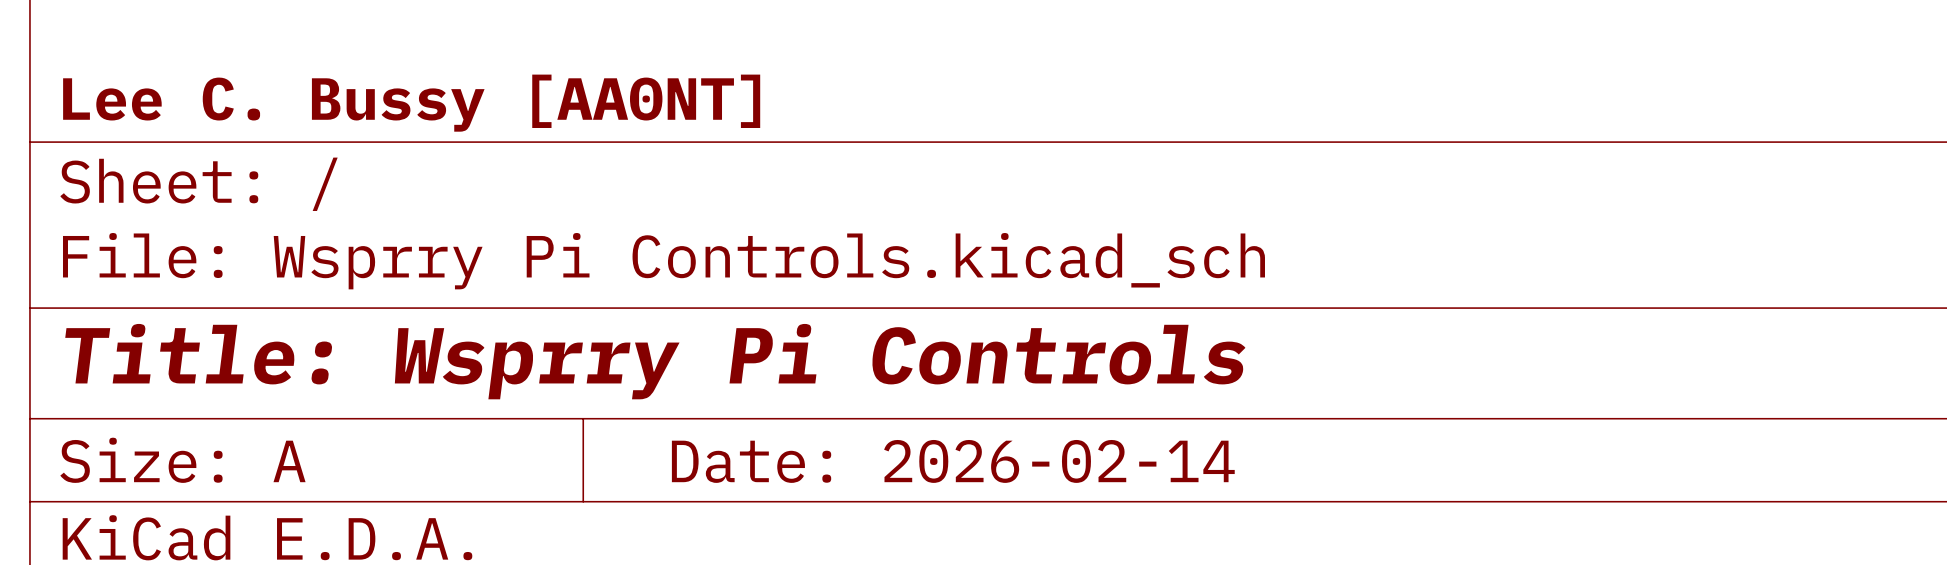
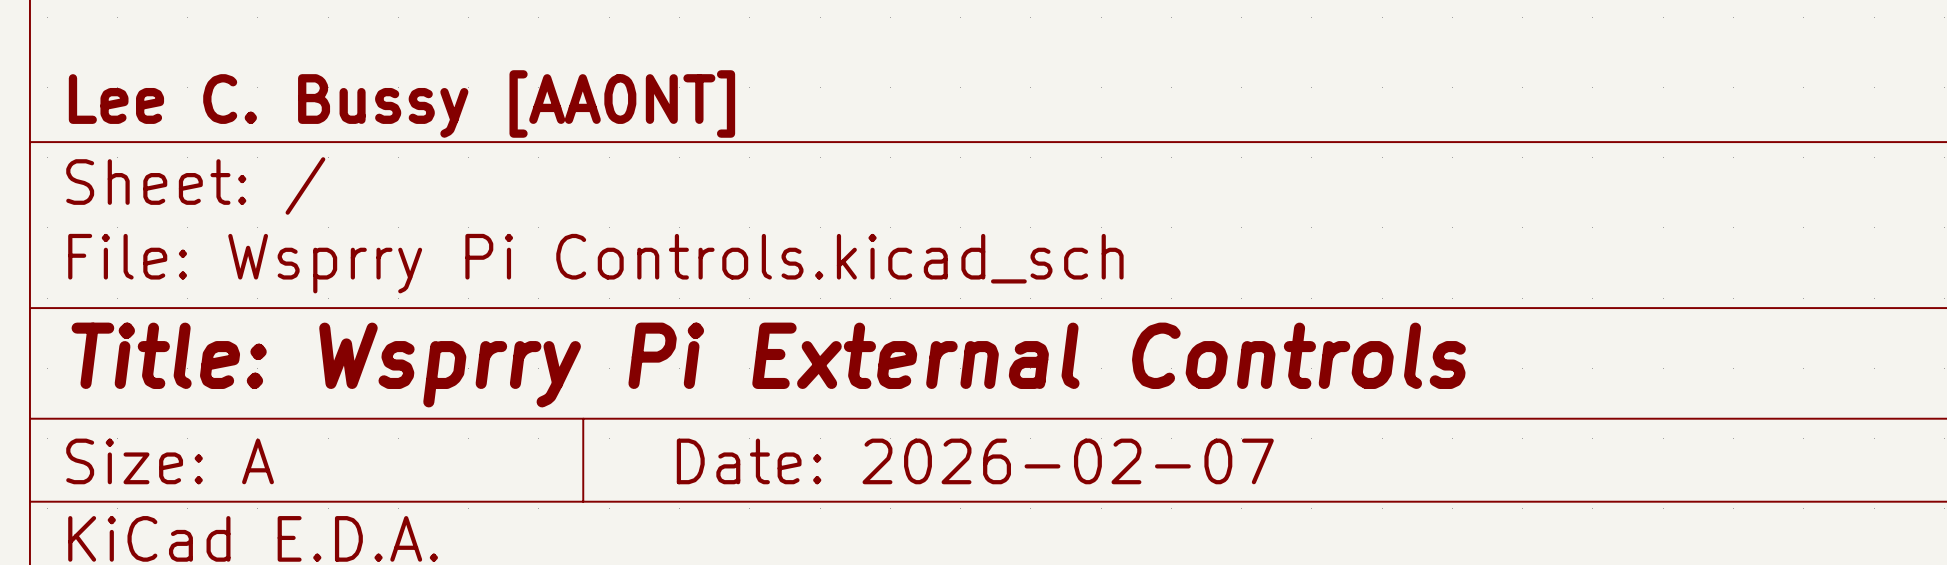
title block: Title: Wsprry Pi Controls (655, 361) -> Title: Wsprry Pi External Controls (768, 365)
title block: Date: 2026-02-14 (953, 461) -> Date: 2026-02-07 (975, 461)

